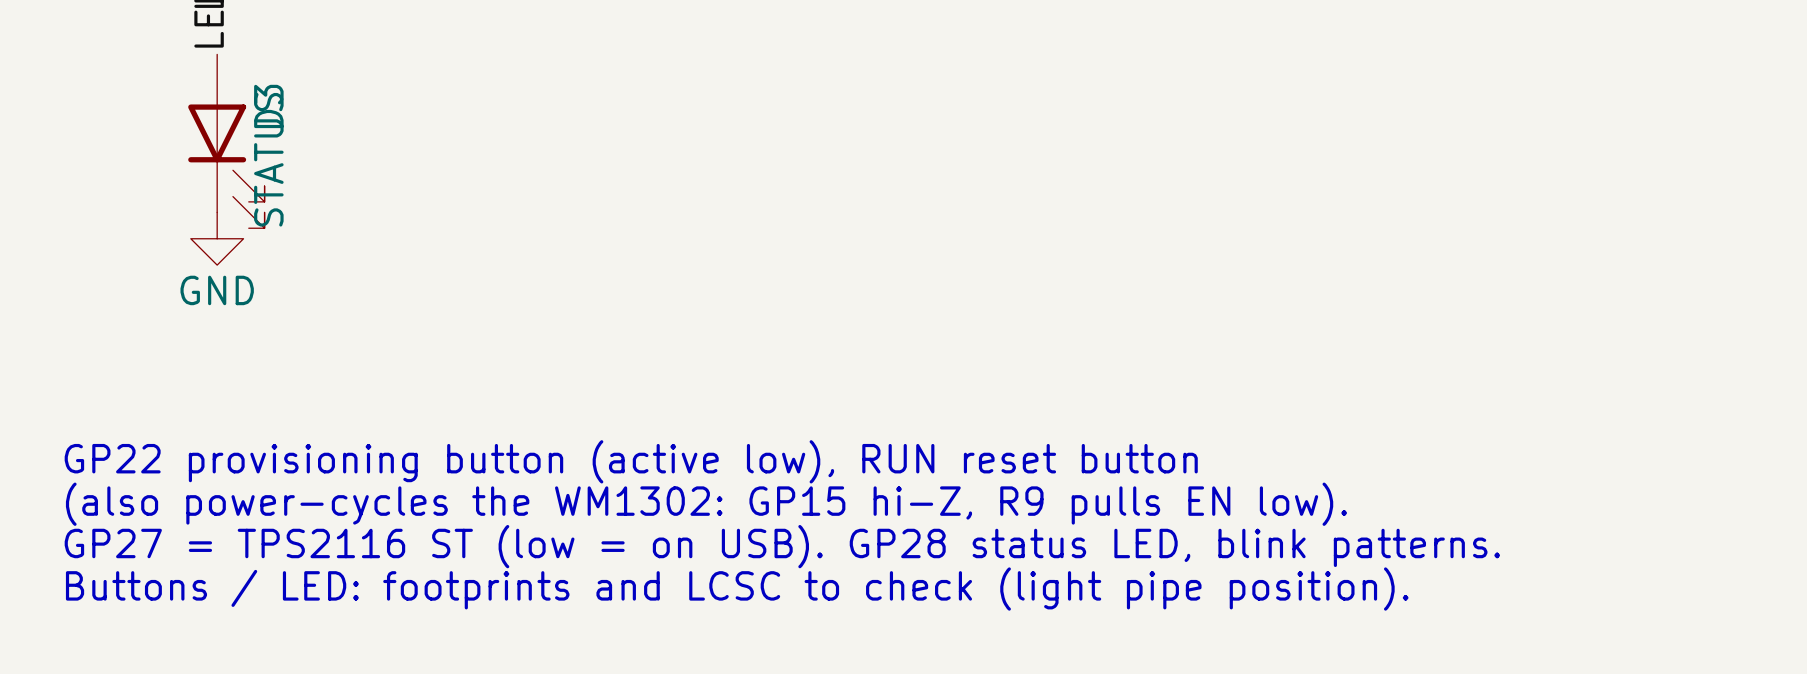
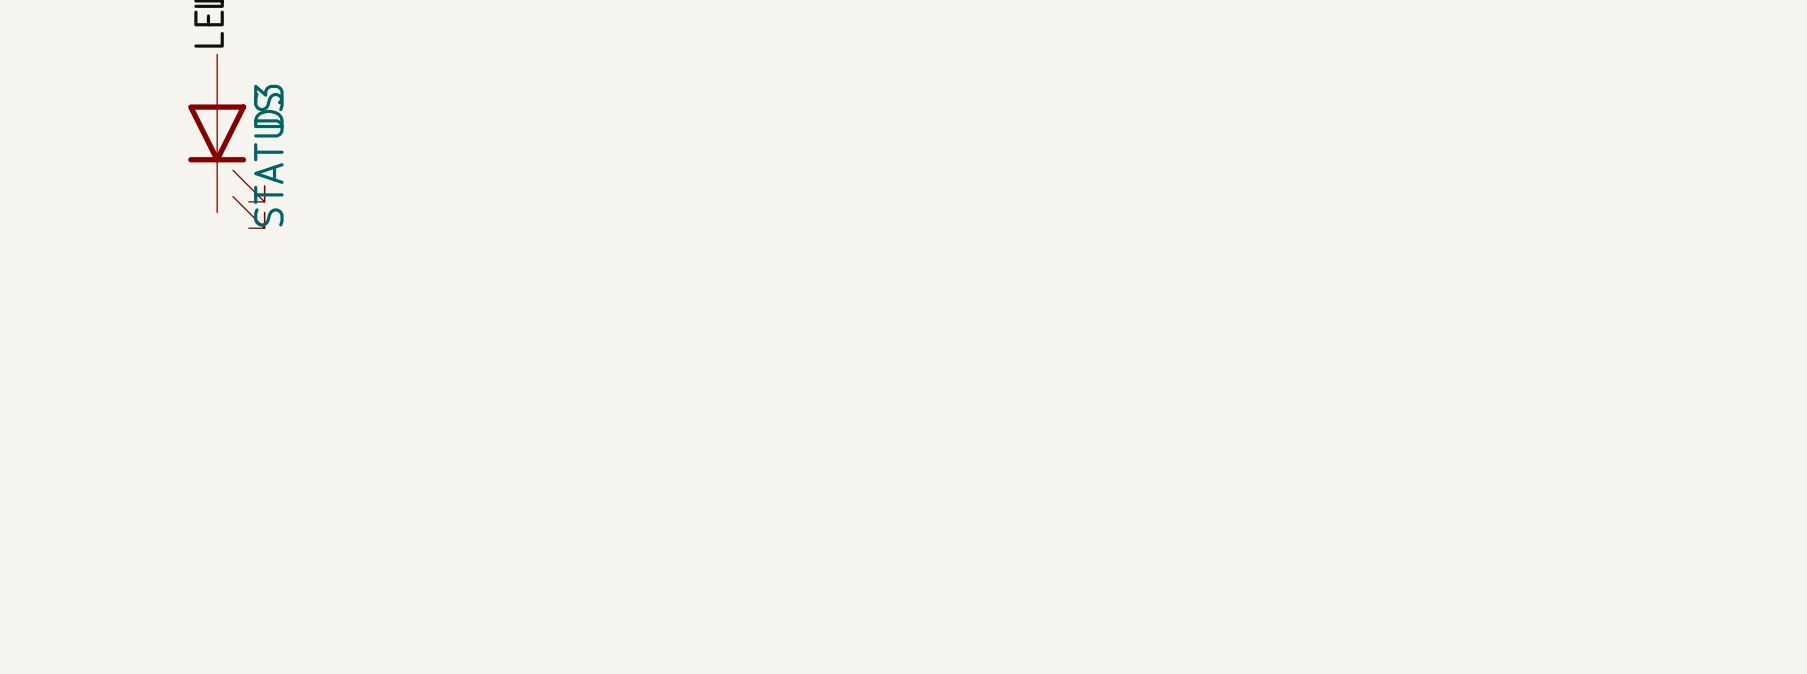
power symbol: GND (217, 238) -> none
text: GP22 provisioning button (active low), RUN reset button (631, 461) -> none
text: (also power-cycles the WM1302: GP15 hi-Z, R9 pulls EN low). (706, 504) -> none
text: GP27 = TPS2116 ST (low = on USB). GP28 status LED, blink patterns. (782, 546) -> none
text: Buttons / LED: footprints and LCSC to check (light pipe position). (737, 589) -> none

